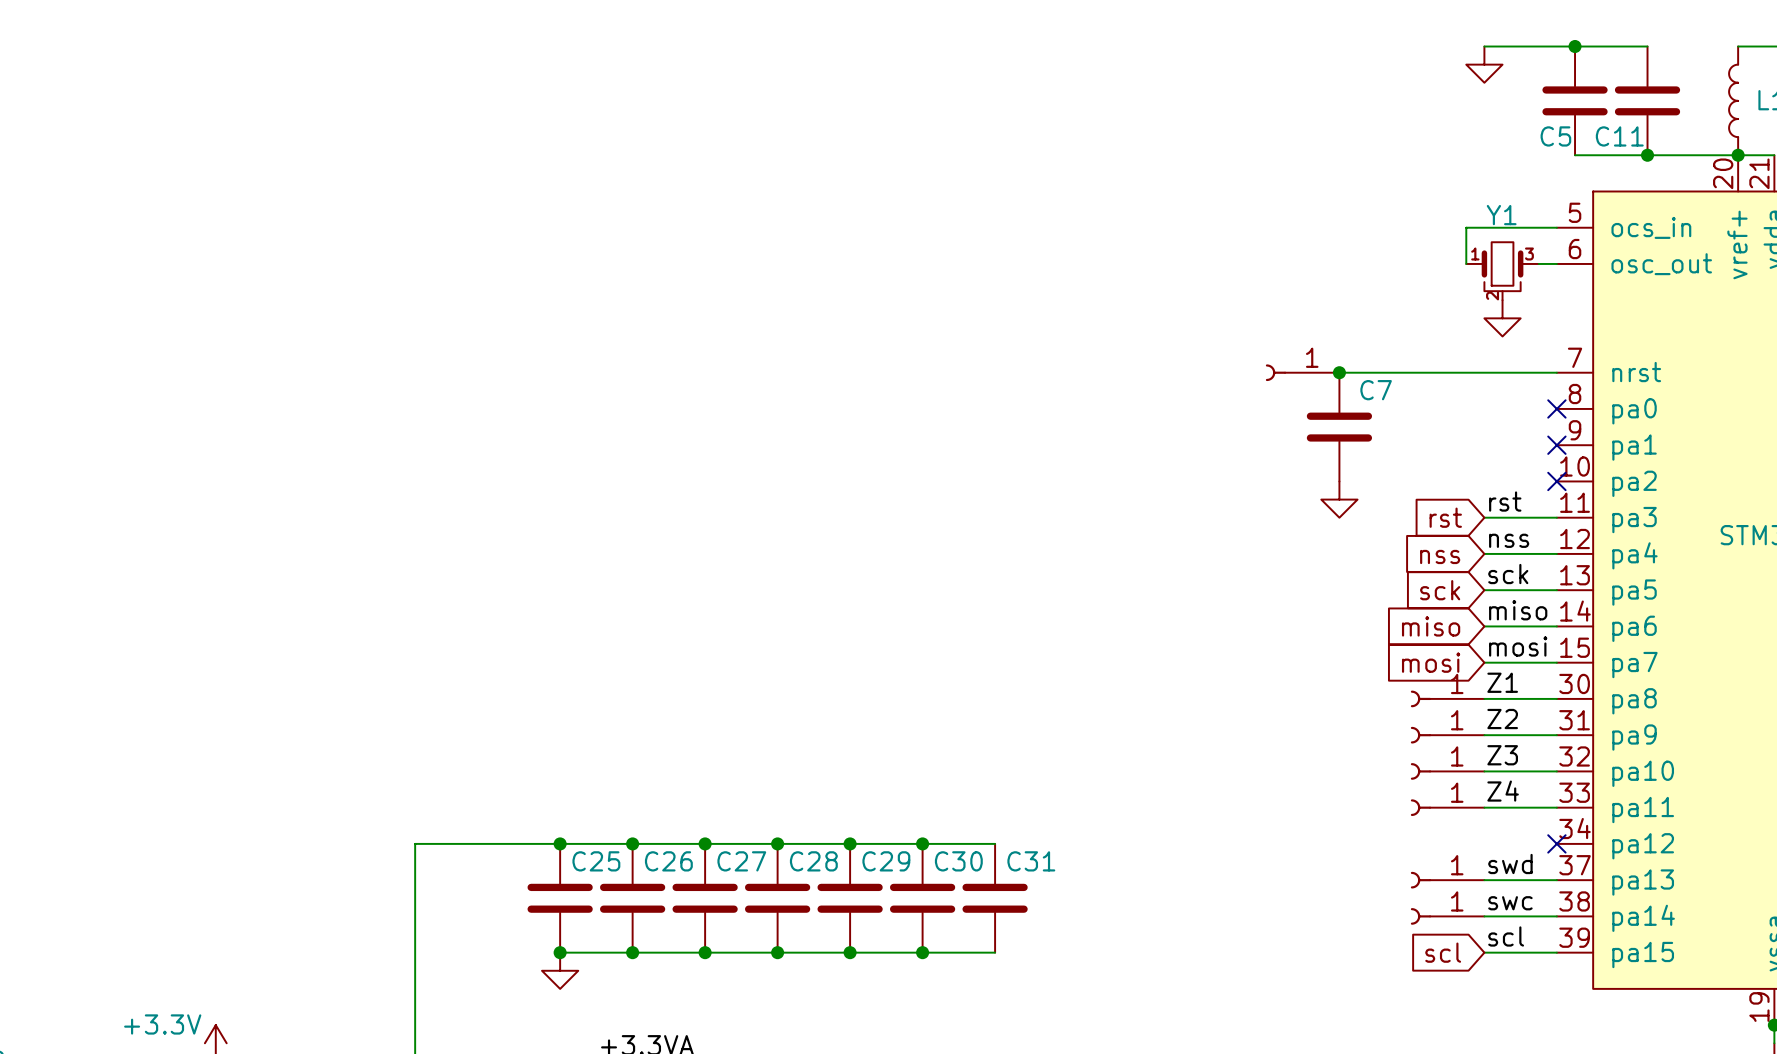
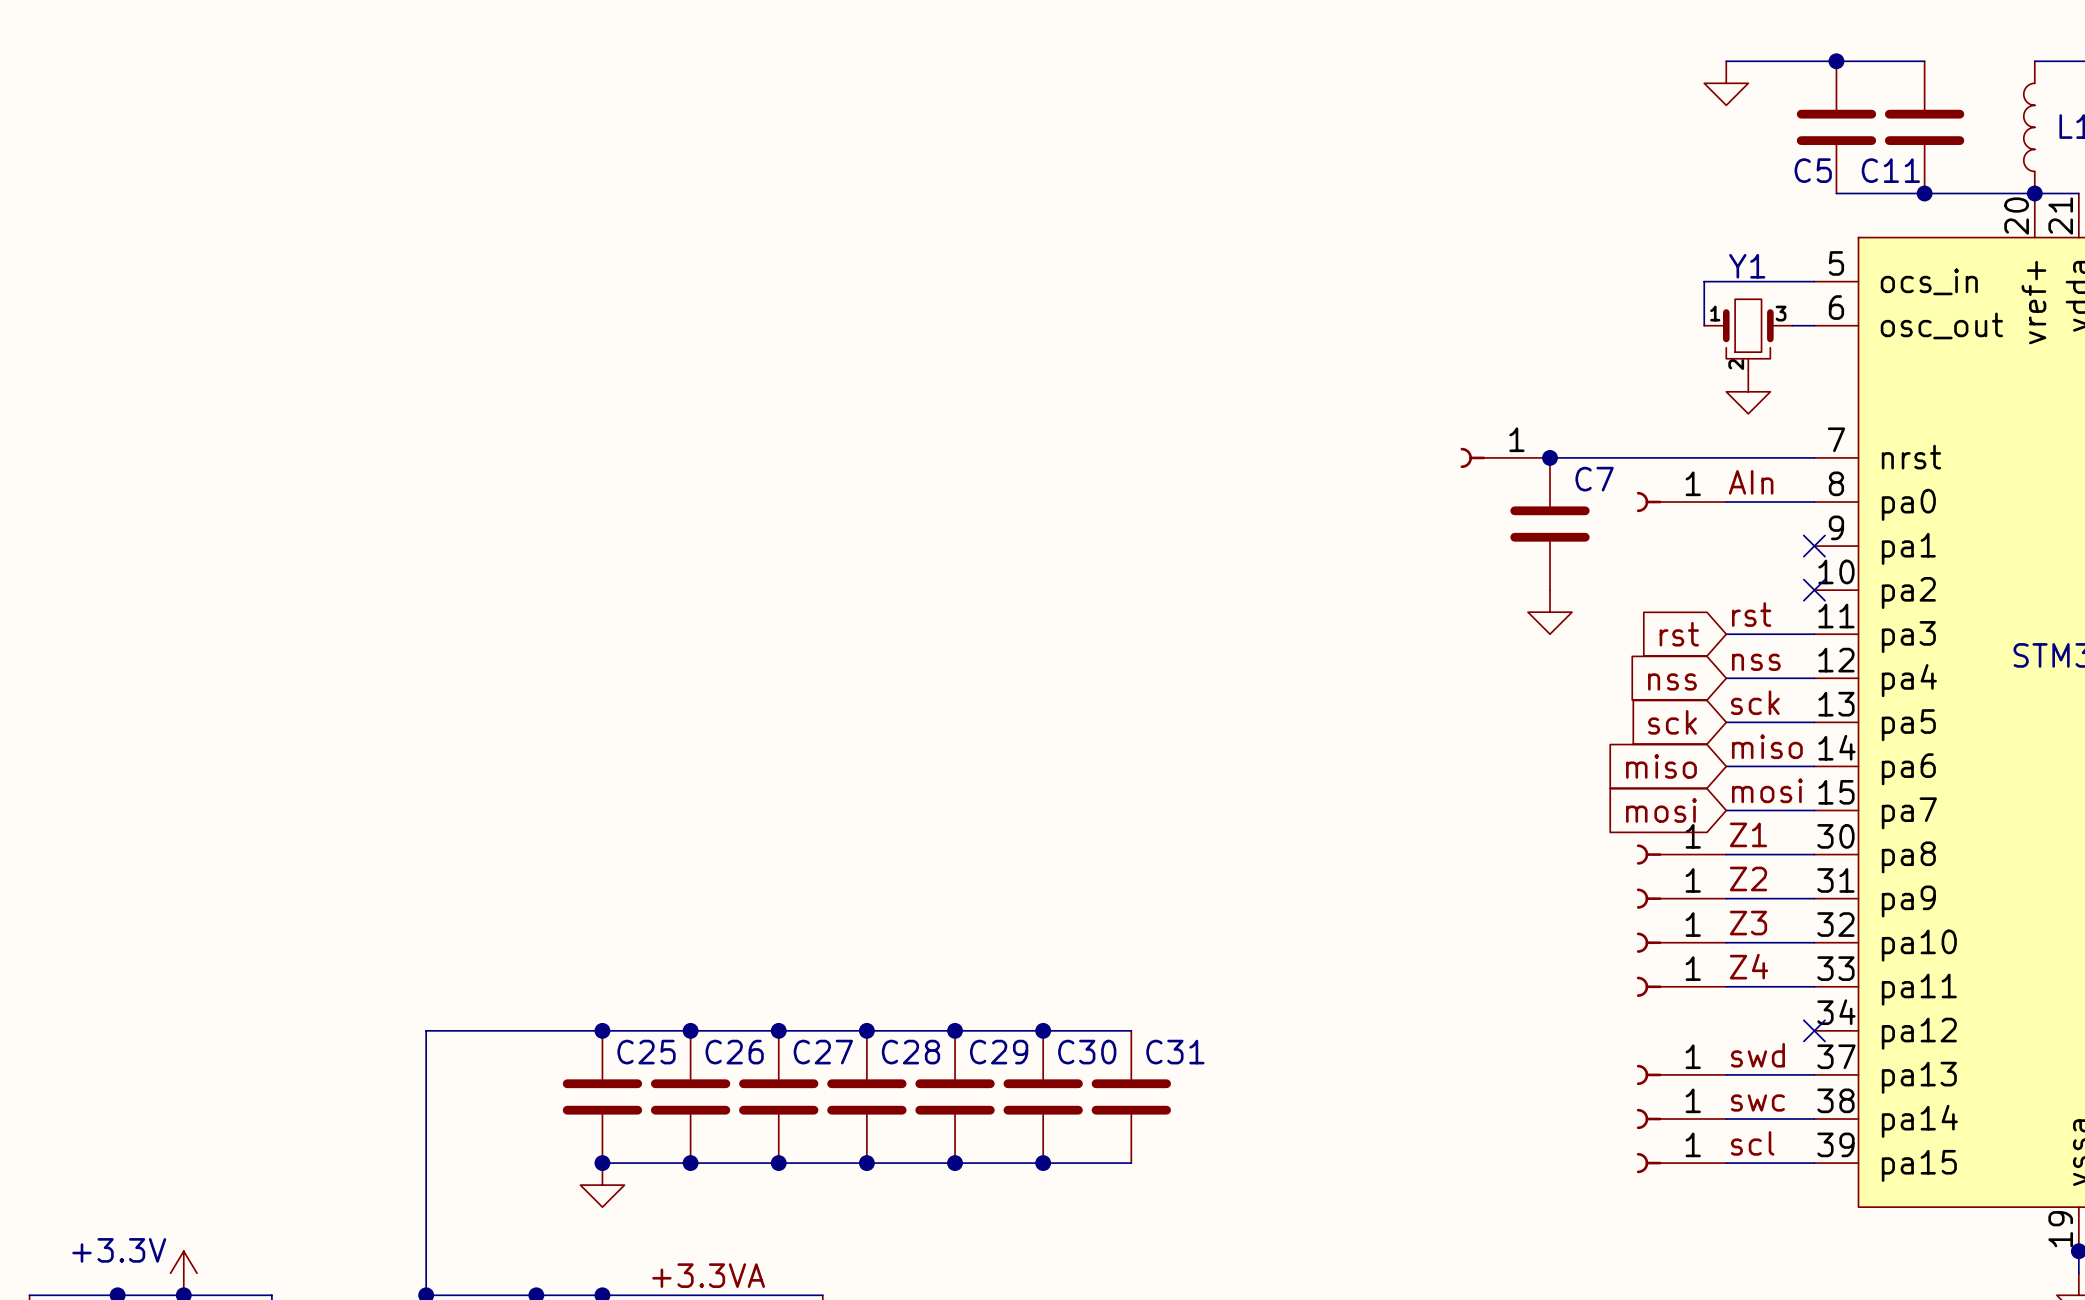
label: none -> AIn (1751, 482)
part: none -> (1681, 502)
wire: none -> (1726, 502) (1814, 502)
no-connect mark: (1556, 408) -> none
global label: scl (1443, 952) -> none
part: none -> (1681, 1163)

